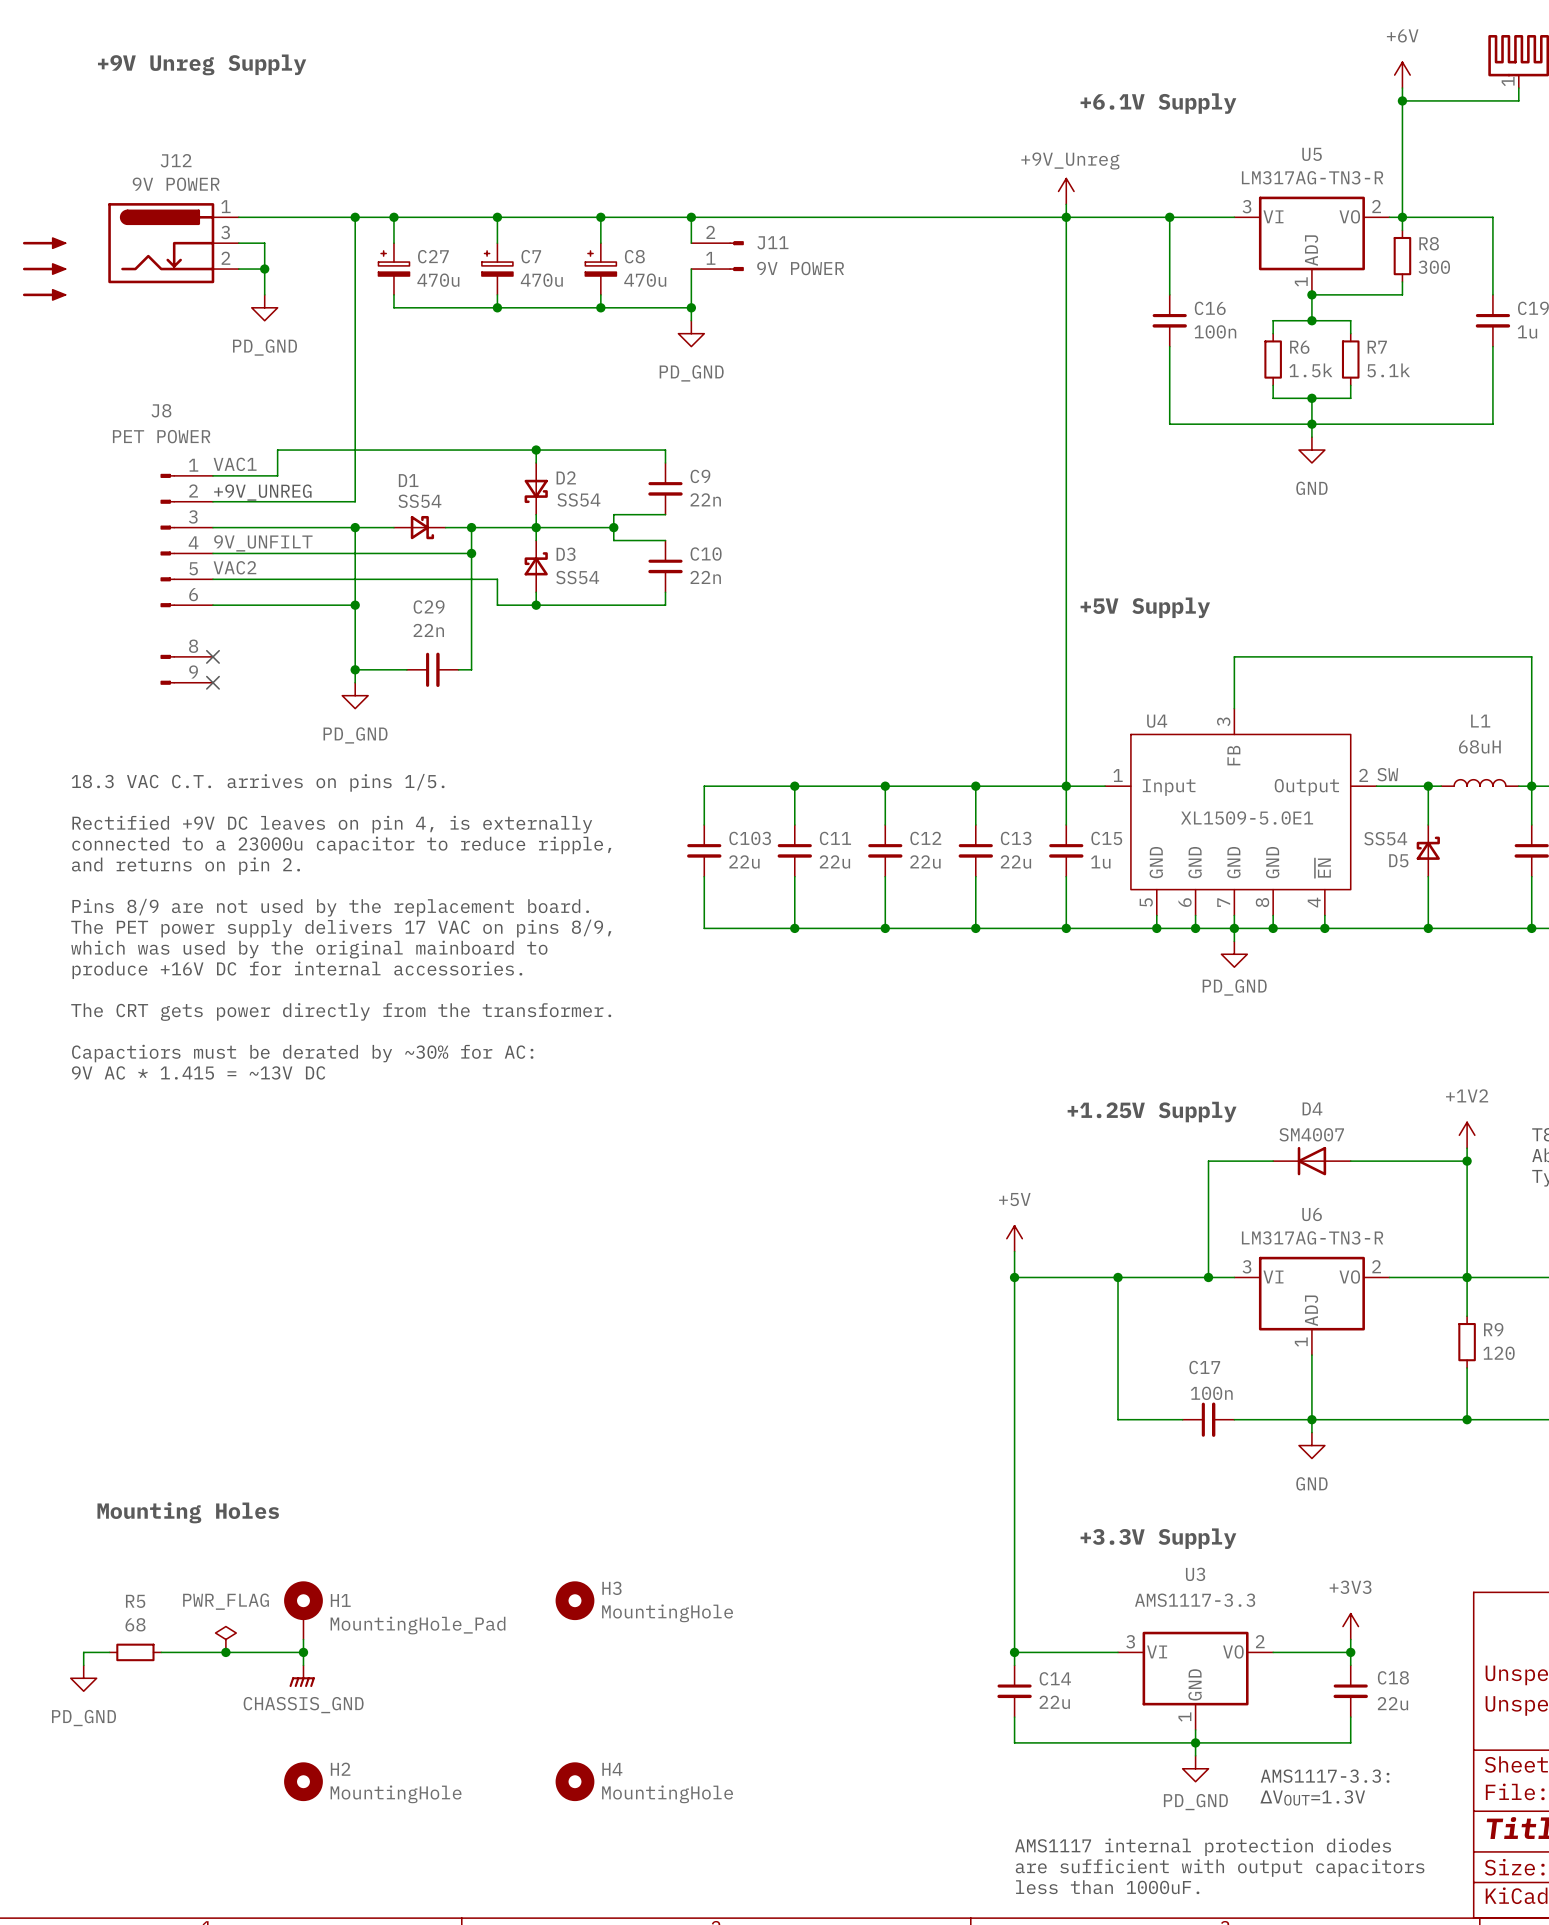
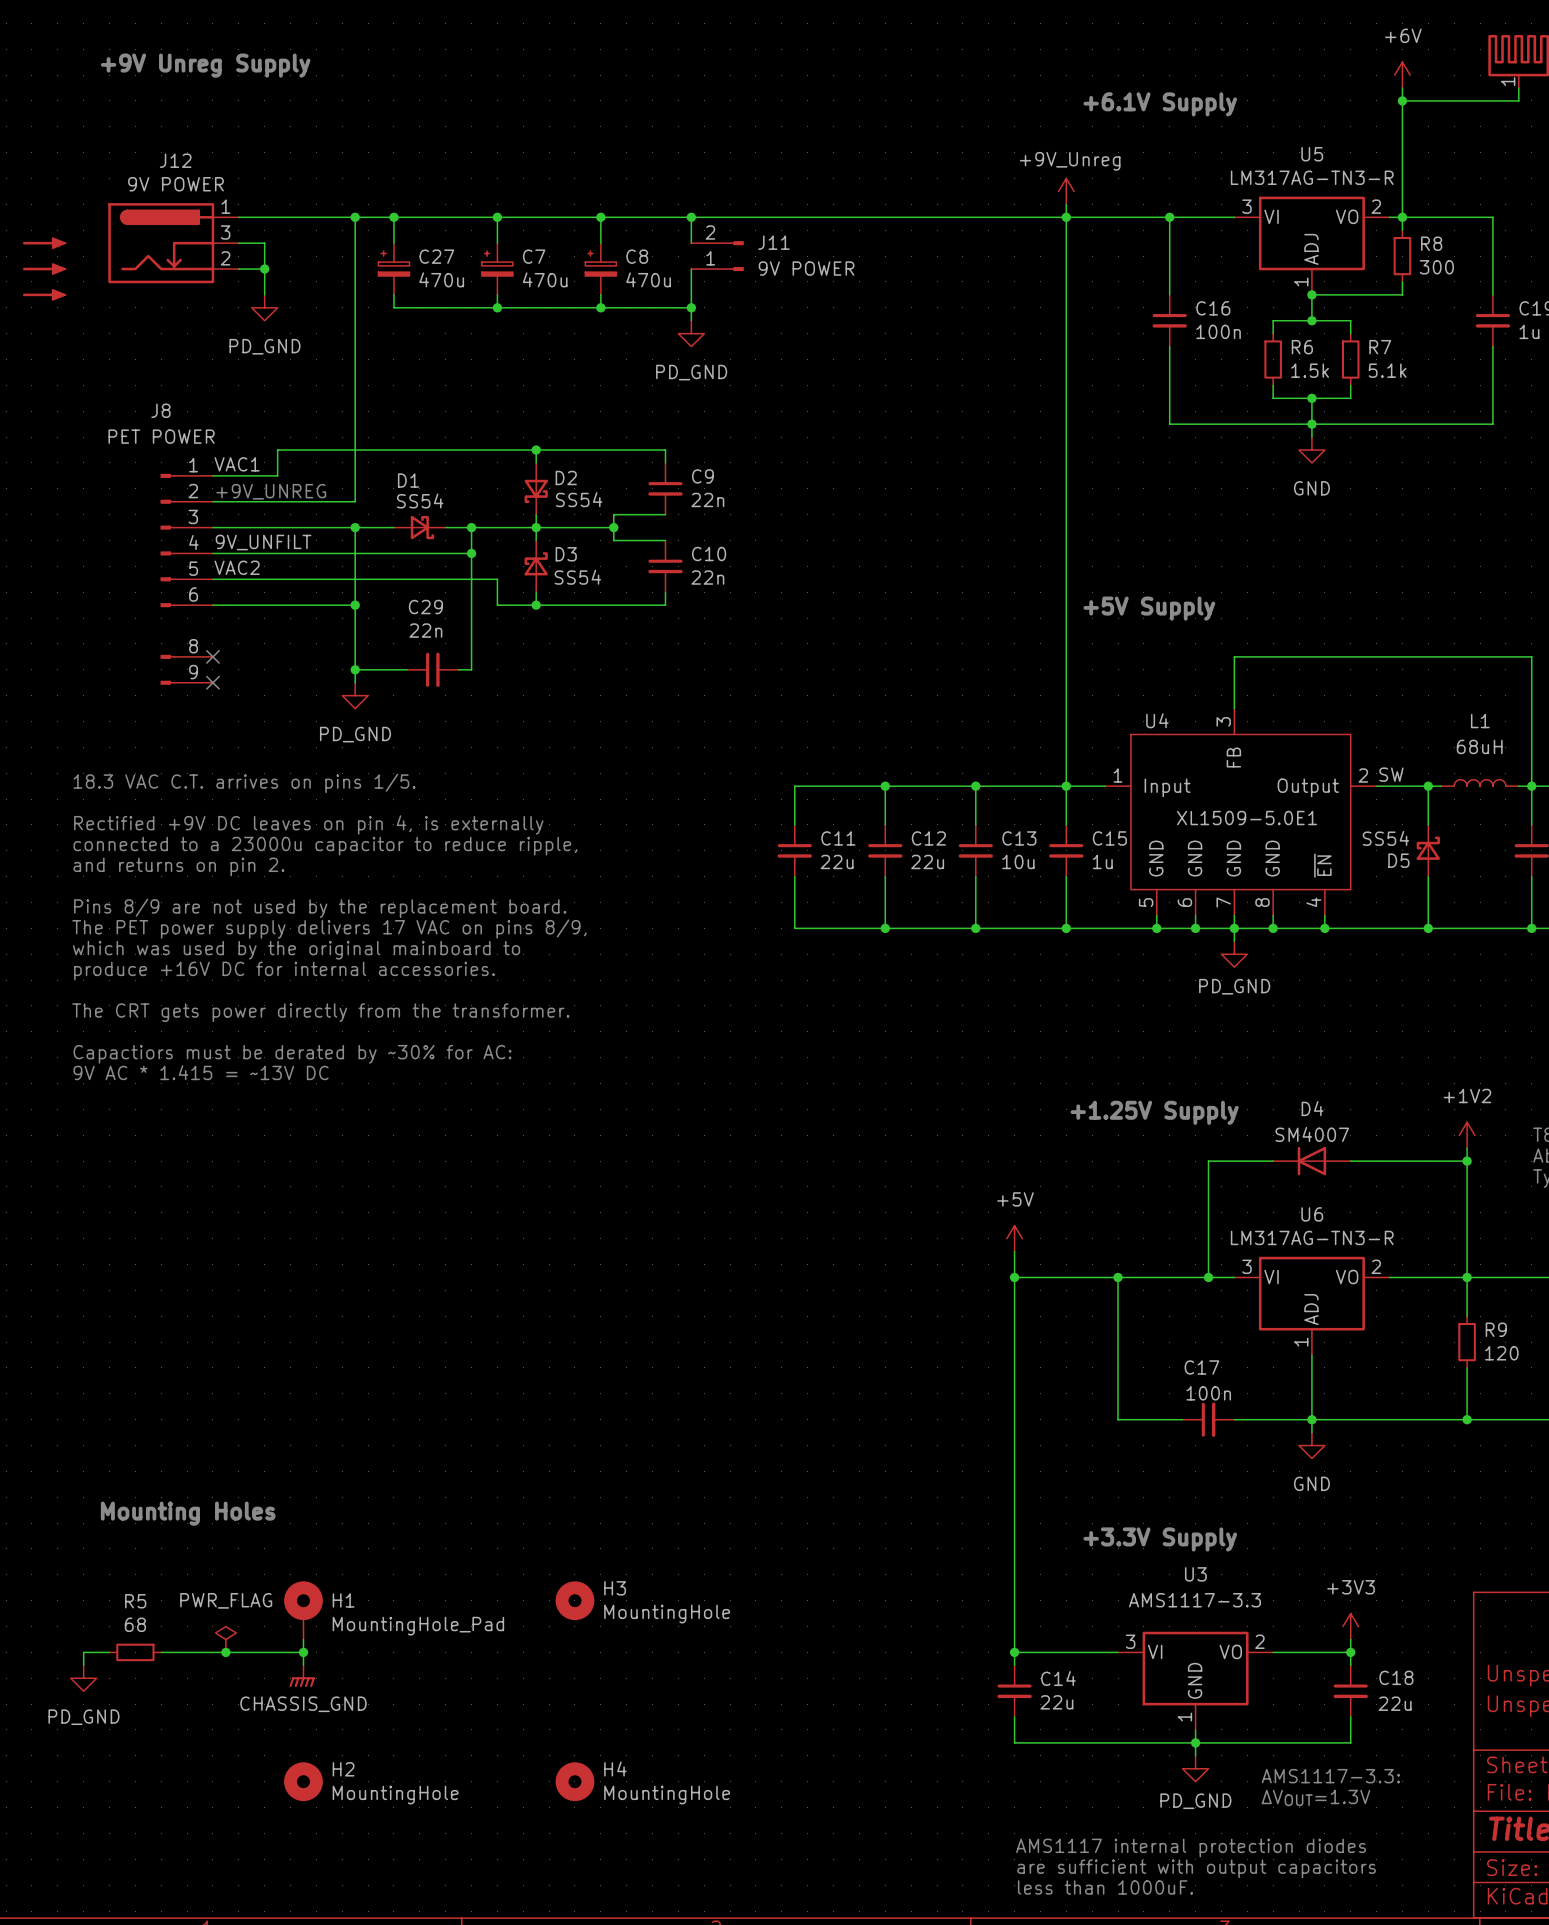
wire: (794, 786) (704, 786) (704, 824) -> none
junction: (794, 786) -> none
C103: 22u (704, 850) -> none
C13 value: 22u (1015, 861) -> 10u (1018, 861)
wire: (704, 876) (704, 928) (794, 928) -> none
junction: (794, 928) -> none

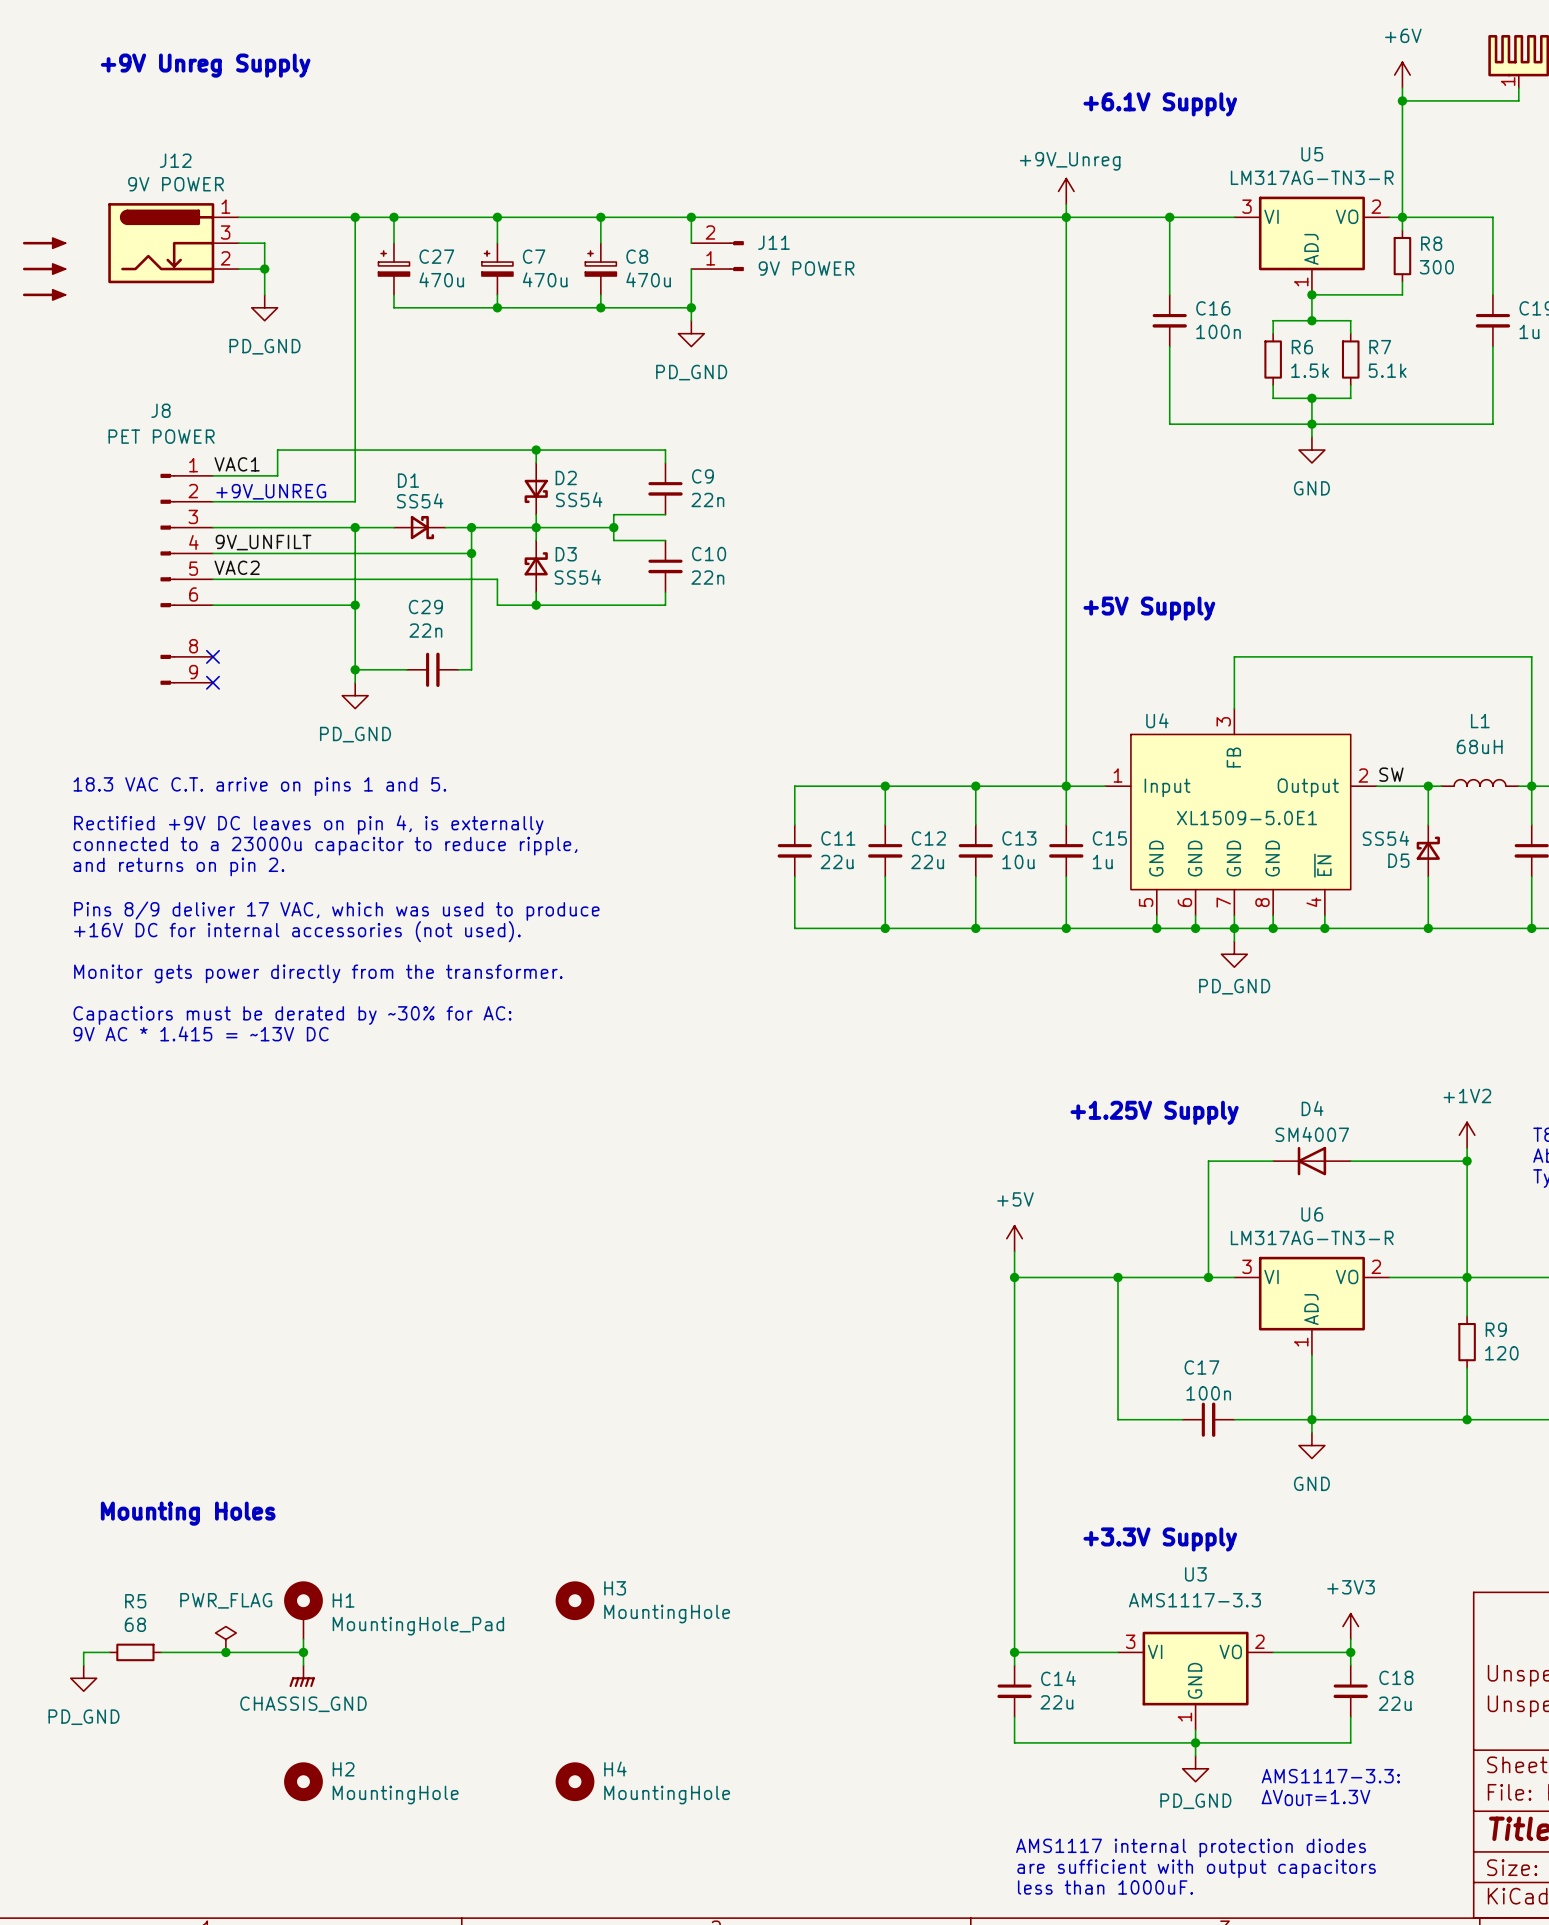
text: 18.3 VAC C.T. arrives on pins 1/5. (244, 783) -> 18.3 VAC C.T. arrive on pins 1 and 5. (259, 786)
text: Pins 8/9 are not used by the replacement board. (320, 908) -> Pins 8/9 deliver 17 VAC, which was used to produce (336, 911)
text: The PET power supply delivers 17 VAC on pins 8/9, (329, 929) -> +16V DC for internal accessories (not used). (297, 931)
text: which was used by the original mainboard to (296, 950) -> none
text: produce +16V DC for internal accessories. (284, 971) -> Monitor gets power directly from the transformer. (318, 973)
text: The CRT gets power directly from the transformer. (320, 1012) -> Capactiors must be derated by ~30% for AC: (292, 1015)
text: Capactiors must be derated by ~30% for AC: (292, 1054) -> none
text position: 9V AC * 1.415 = ~13V DC (201, 1072) -> 9V AC * 1.415 = ~13V DC (201, 1033)

